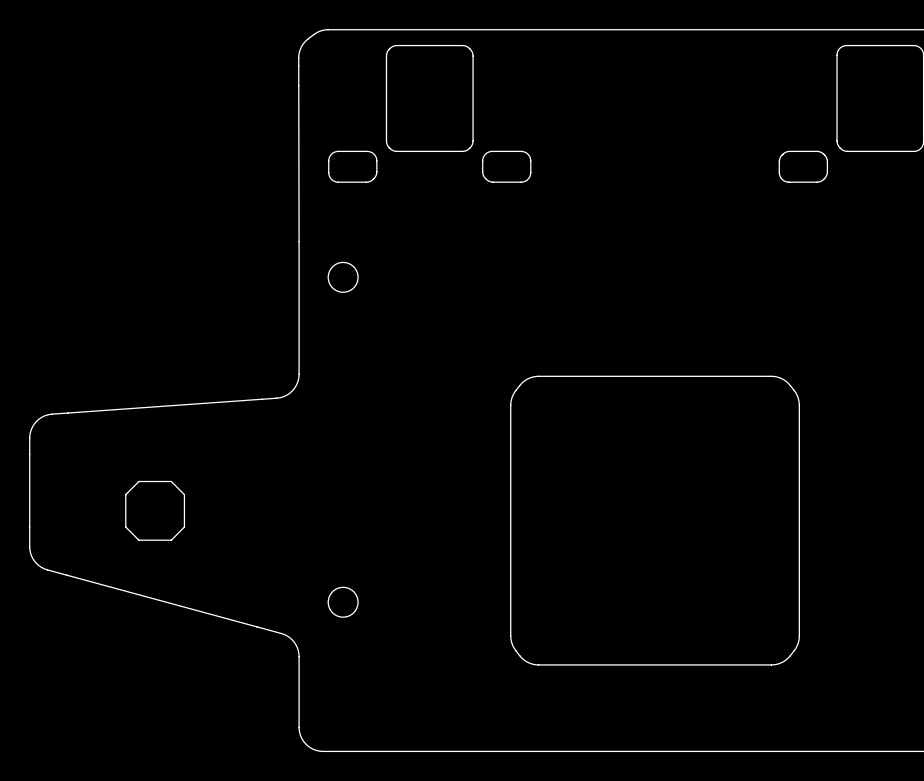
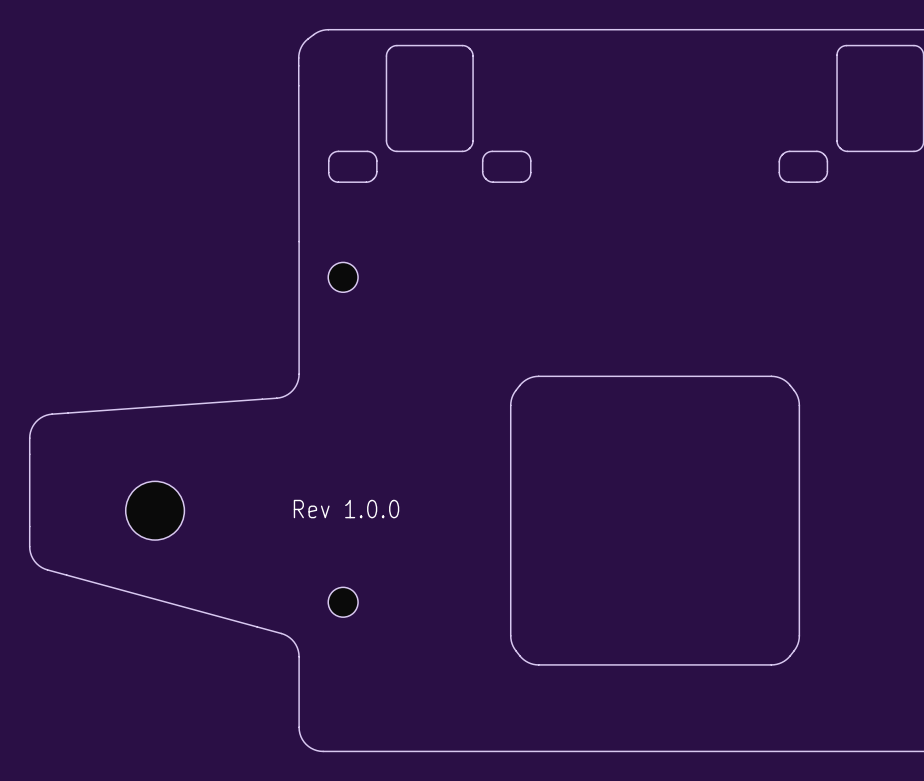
board edge: (138, 481) (171, 481) (184, 494) (184, 527) (171, 540) (138, 540) (125, 527) (125, 494) (138, 481) -> none
text: none -> Rev 1.0.0 (346, 509)
hole: none -> (155, 510)

